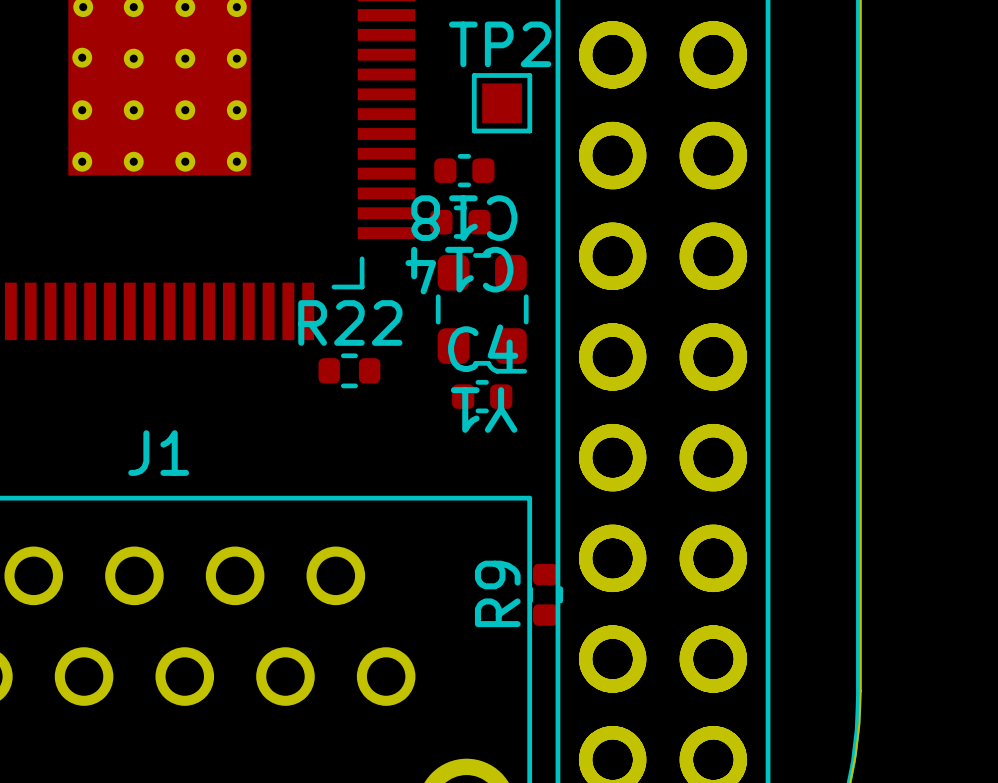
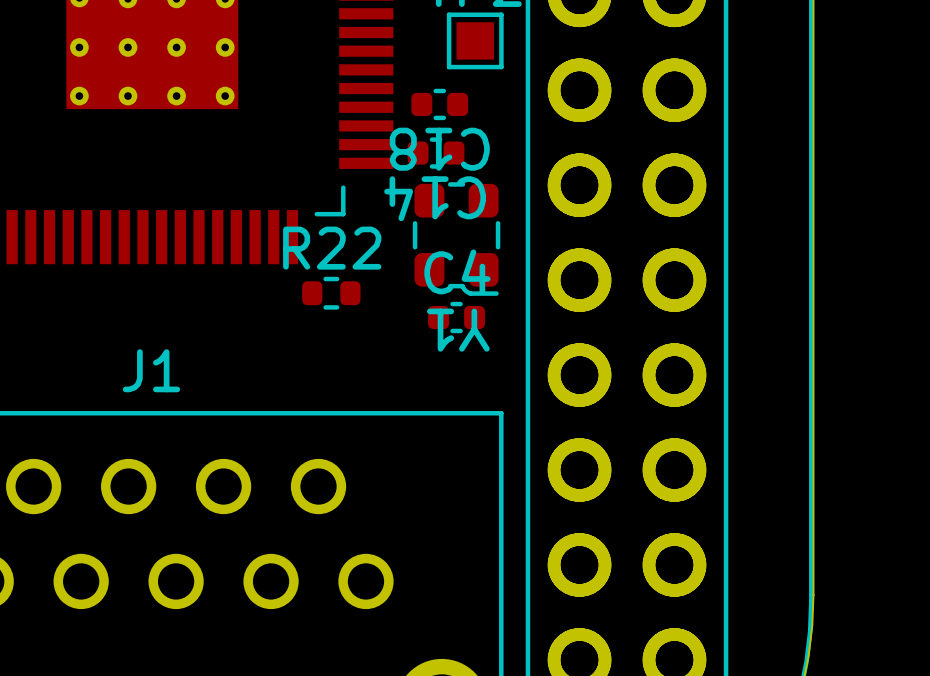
R9: (545, 594) -> none

